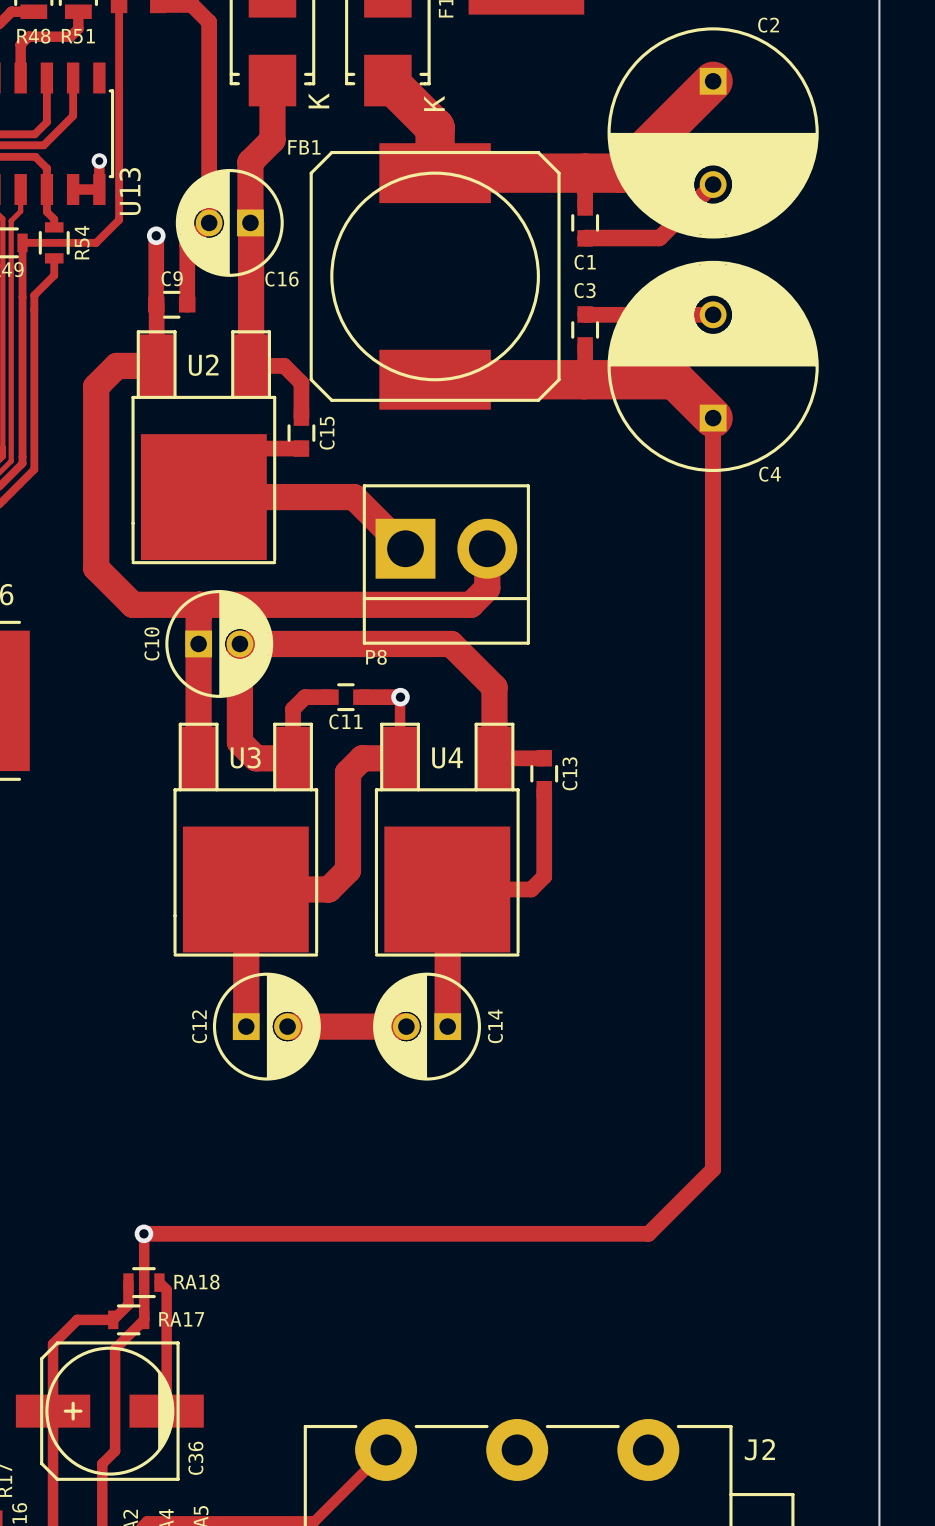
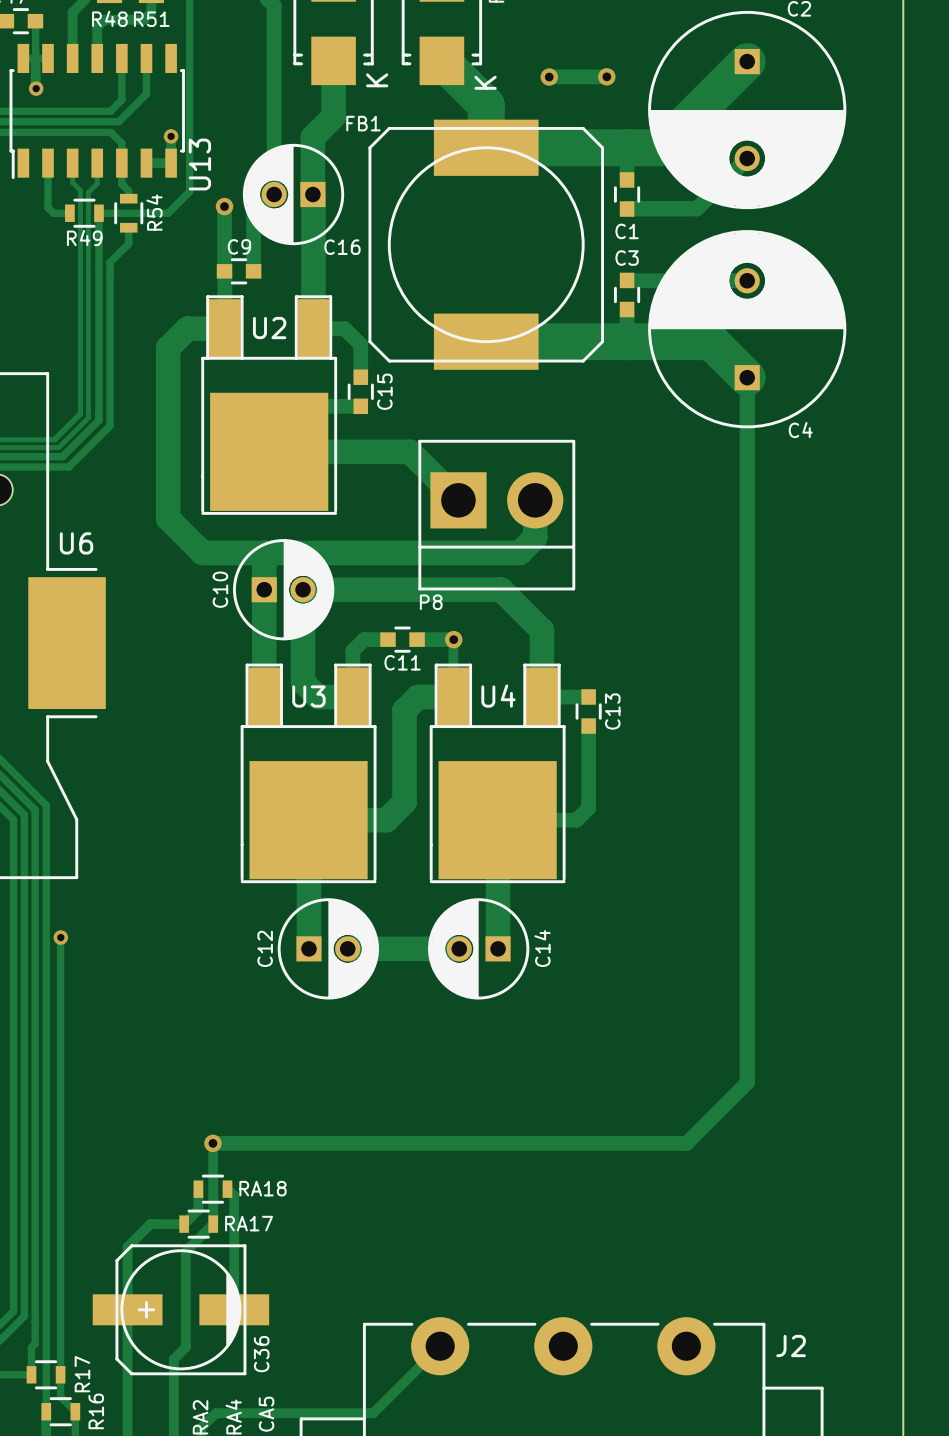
track: none -> (549, 76) (606, 76)
via: none -> (549, 77)
via: none -> (606, 76)

